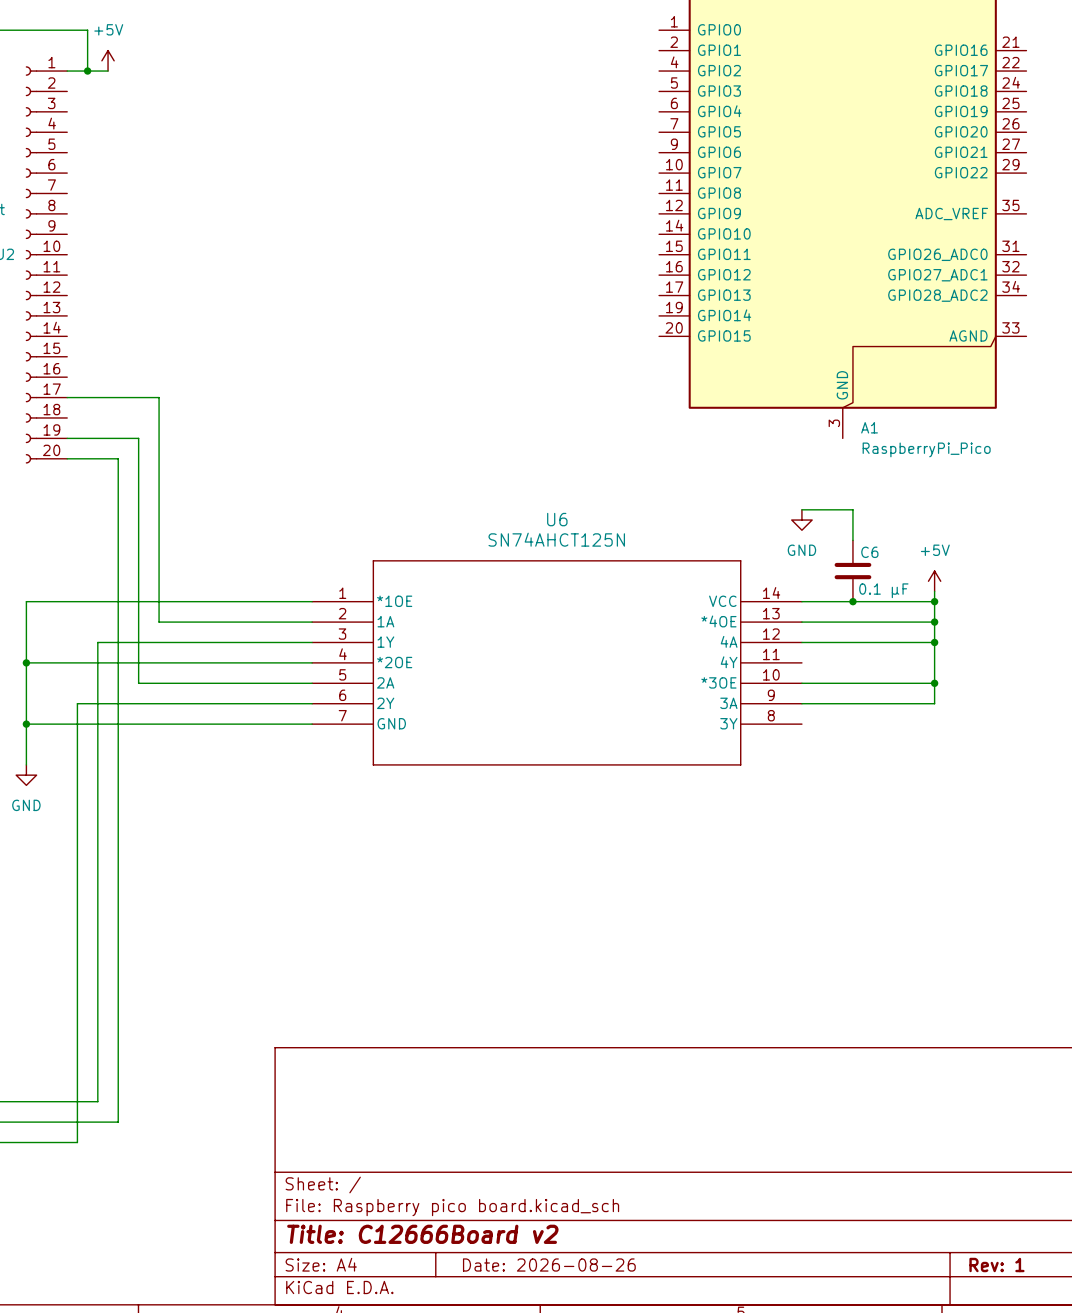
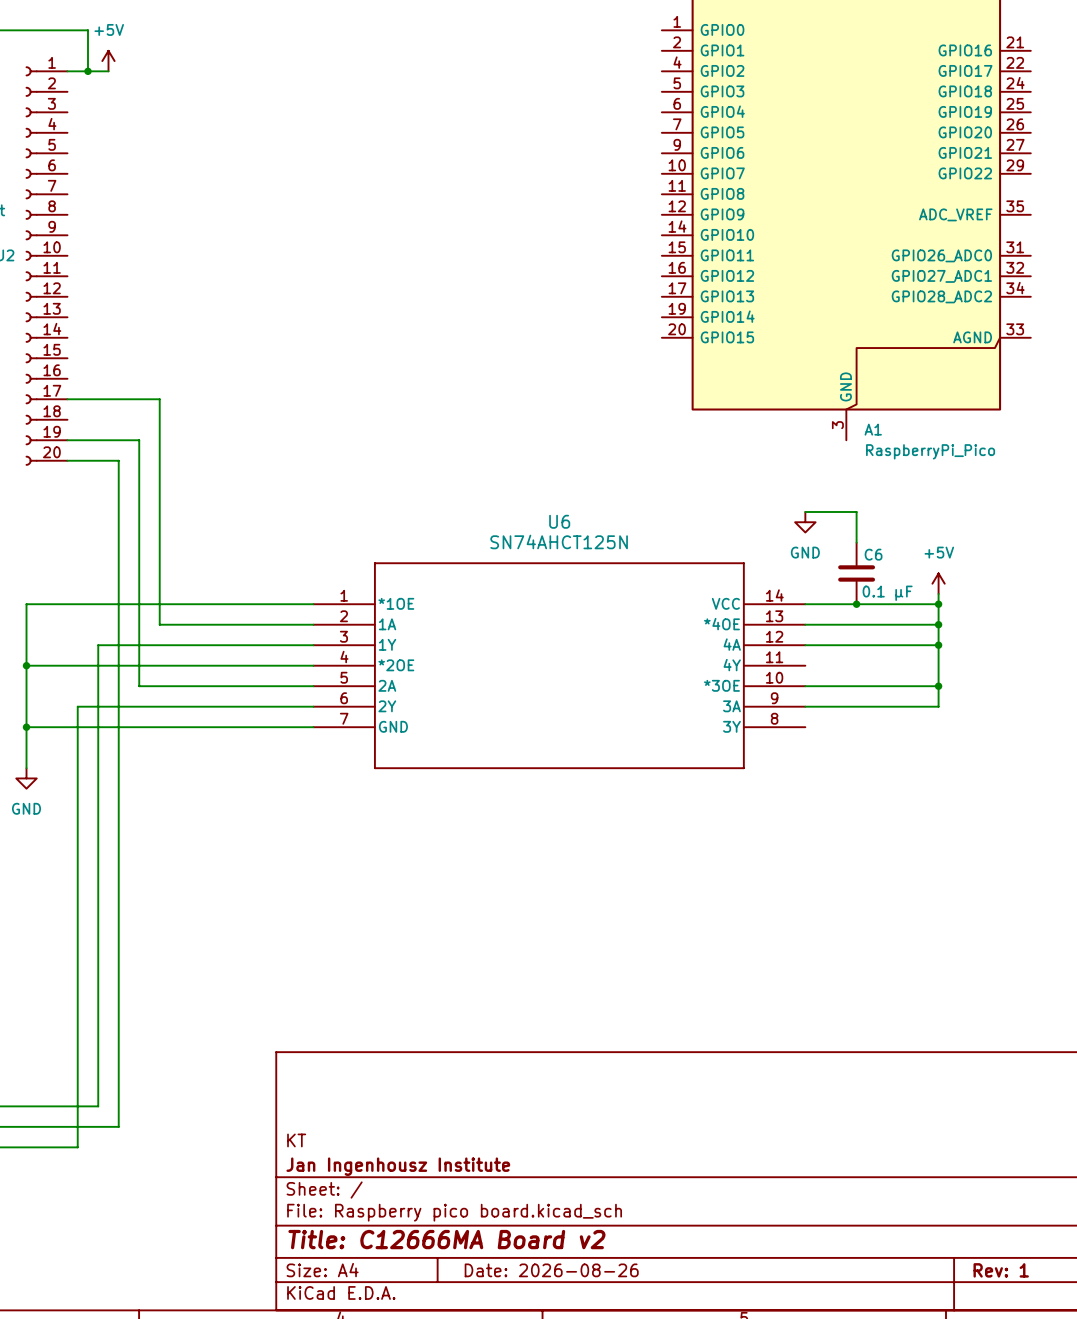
title block: none -> KT (296, 1140)
title block: none -> Jan Ingenhousz Institute (398, 1166)
title block: Title: C12666Board v2 (422, 1234) -> Title: C12666MA Board v2 (446, 1239)

